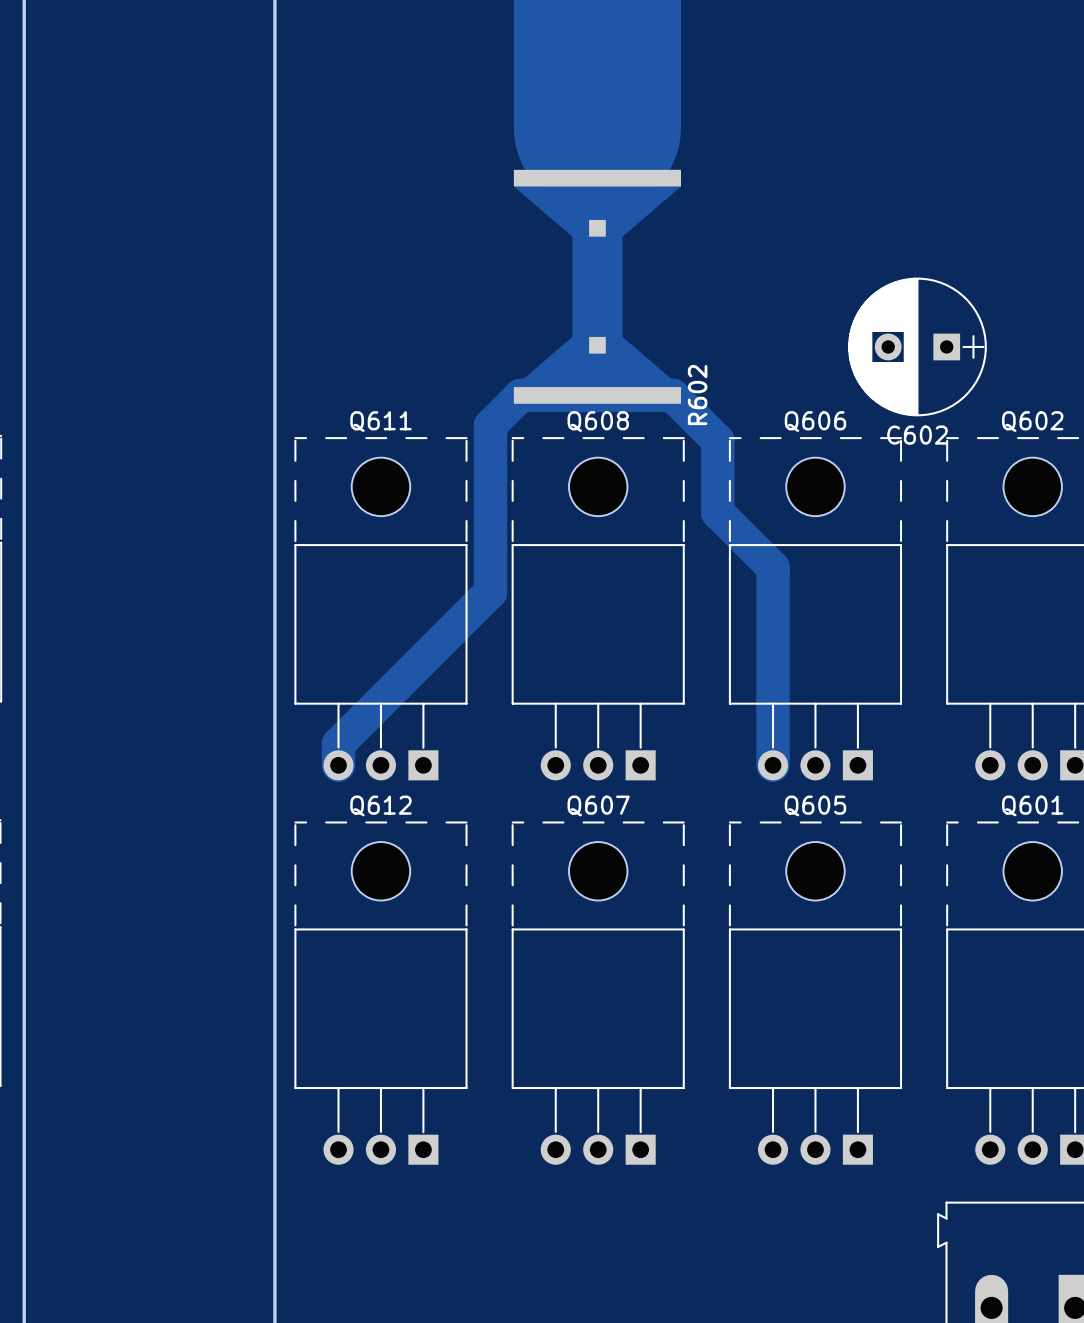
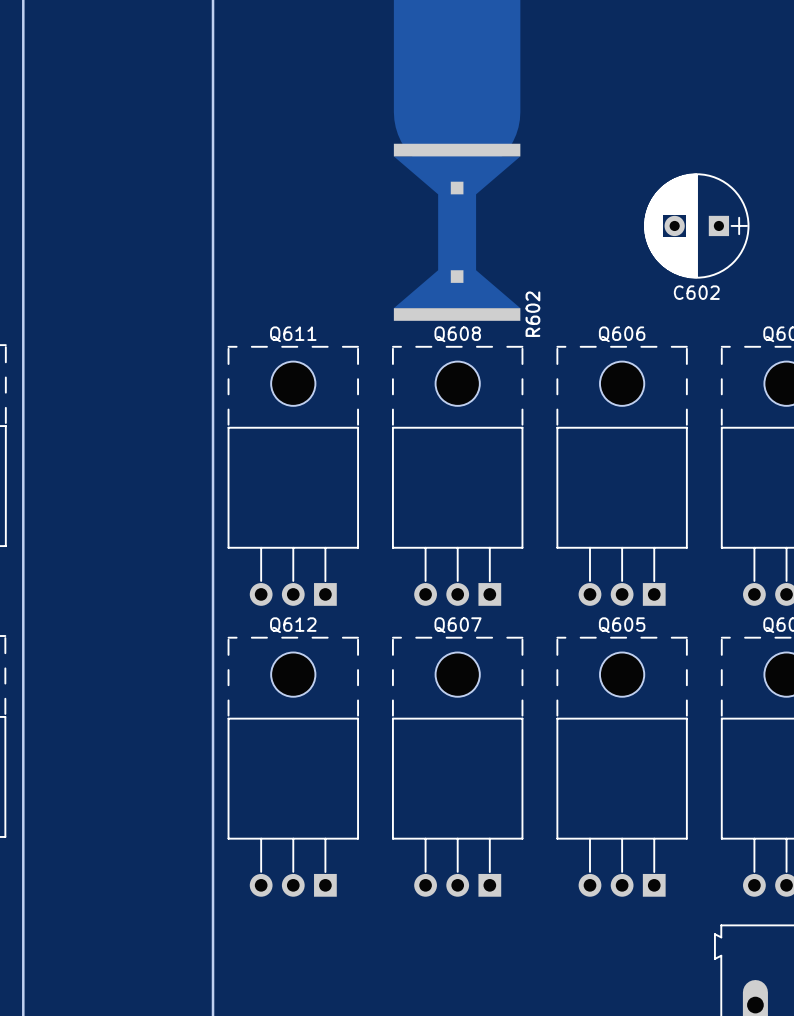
C602 position: (917, 346) -> (696, 225)
track: (338, 765) (338, 744) (490, 592) (490, 425) (520, 395) (672, 395) (717, 440) (717, 512) (773, 567) (773, 765) -> none

